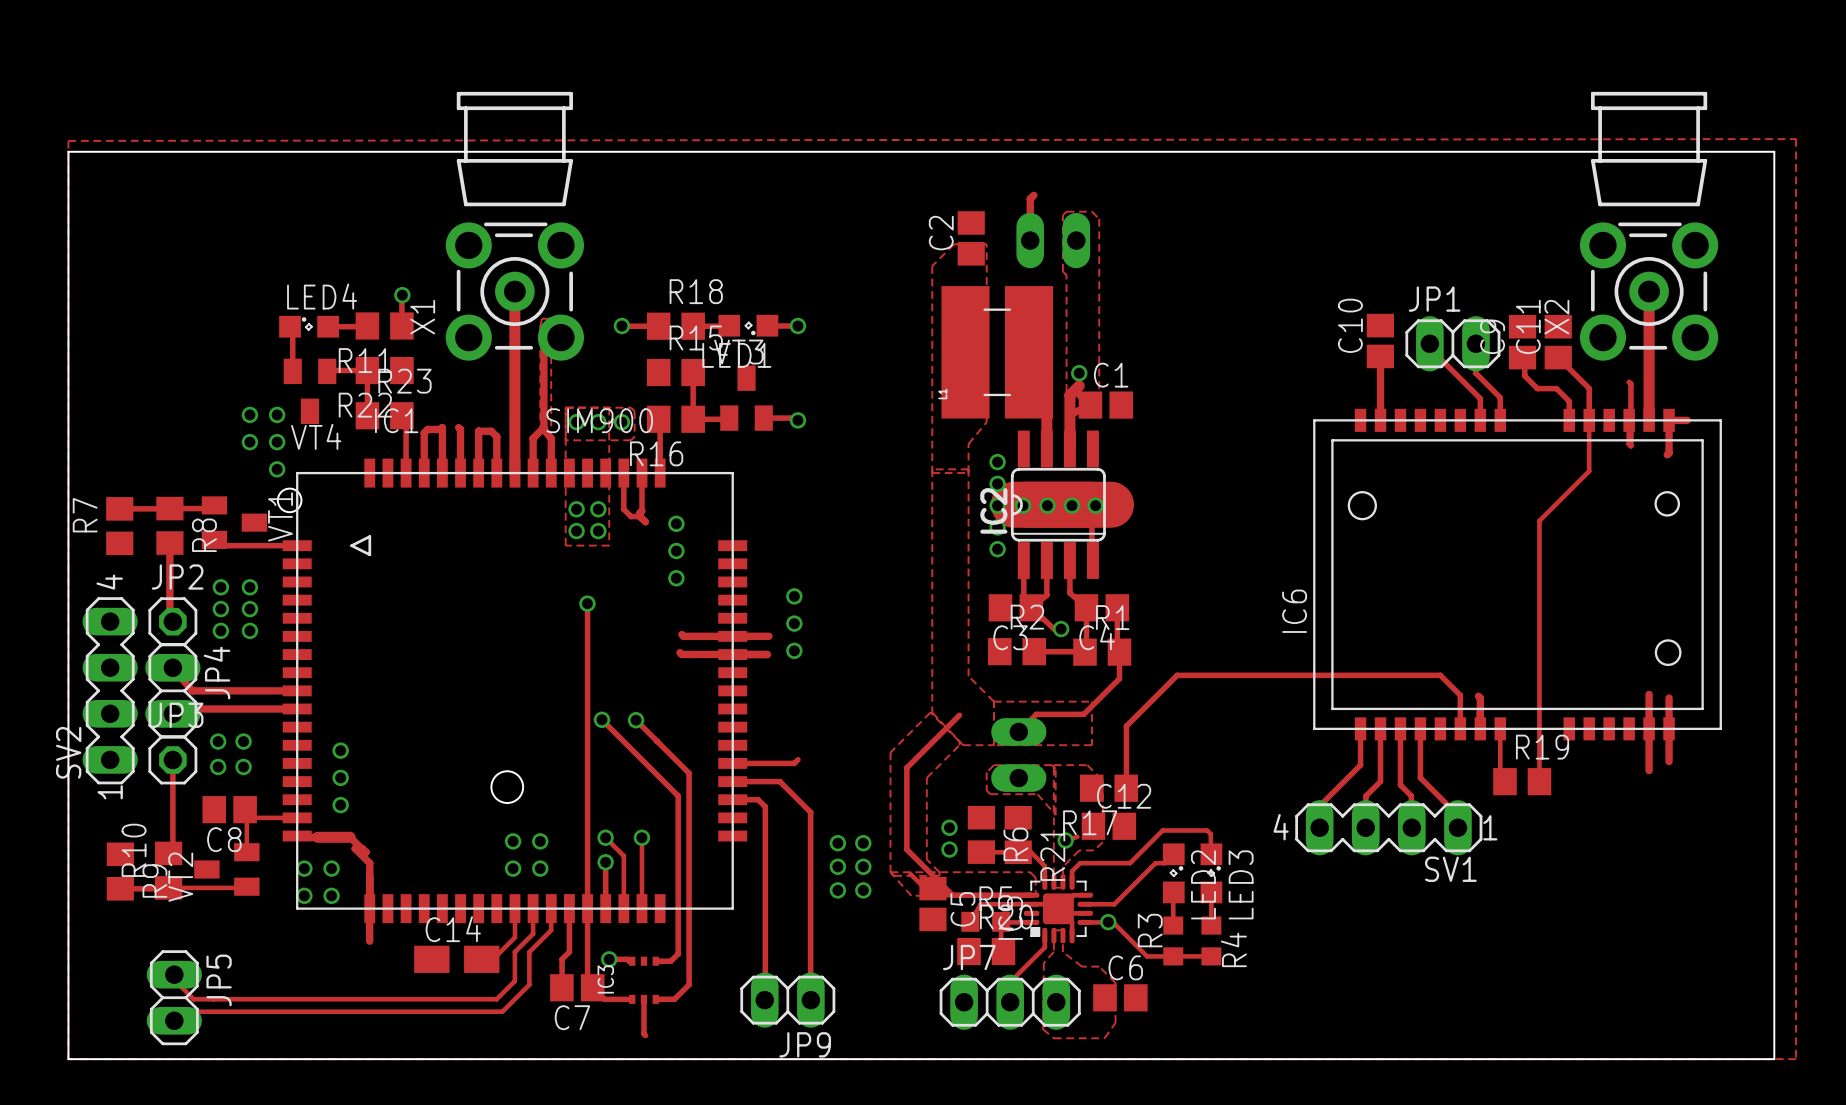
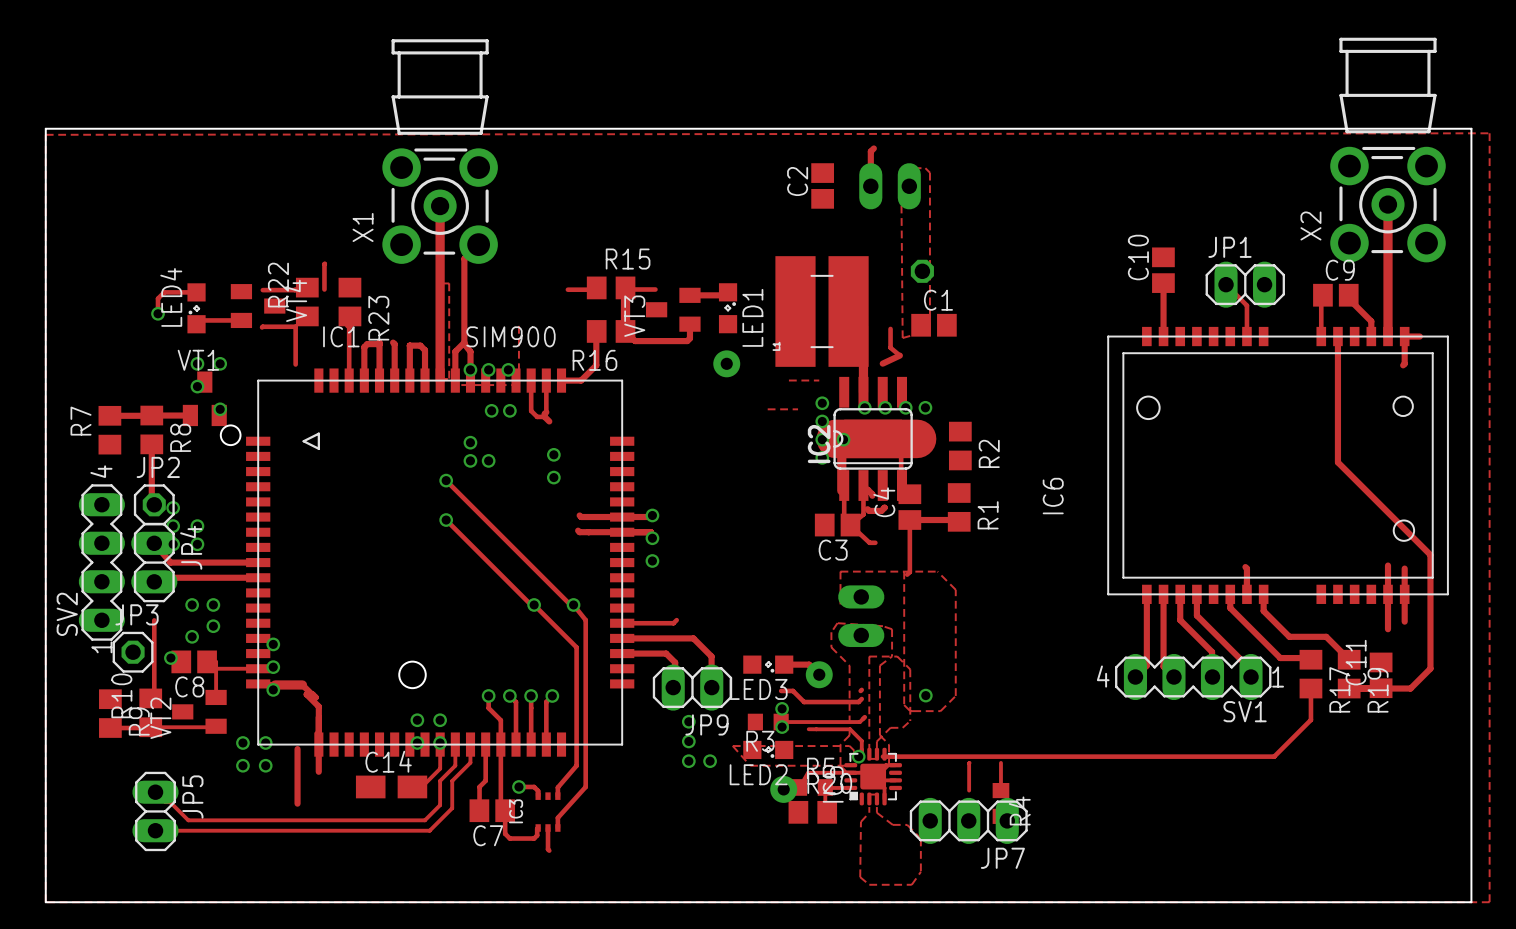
board edge: (68, 151) (1774, 151) -> (45, 143) (45, 128) (1471, 128) (1471, 143)
zone outline: none -> (901, 168) (925, 168) (929, 172) (929, 330) (902, 338) (901, 168)
track: (1033, 195) (1030, 198) (1030, 240) -> (873, 148) (870, 151) (870, 186)
zone outline: (1066, 211) (1062, 215) (1062, 271) (1066, 275) (1066, 416) (1099, 416) (1099, 218) (1091, 211) (1066, 211) -> none
track: none -> (1388, 204) (1388, 336)
X1 position: (514, 226) -> (440, 151)
track: none -> (440, 206) (440, 380)
X2 position: (1649, 226) -> (1388, 150)
C2 position: (971, 238) -> (822, 185)
part position: (1053, 240) -> (890, 186)
track: none -> (478, 244) (464, 258) (464, 342) (455, 351) (455, 380)
track: (514, 291) (514, 473) -> none
track: (1649, 291) (1649, 420) -> none
via: (402, 295) -> none
part: none -> (922, 271)
track: none -> (1226, 284) (1246, 305) (1246, 336)
track: none -> (625, 287) (625, 331) (635, 341) (687, 341) (689, 338) (689, 324)
LED1 rotation: 0° (748, 325) -> 90° counterclockwise (728, 308)
LED1 position: (748, 325) -> (728, 308)
track: (290, 326) (292, 329) (292, 371) -> none
LED4 rotation: 0° (309, 326) -> 90° counterclockwise (196, 308)
LED4 position: (309, 326) -> (196, 308)
R11: (384, 326) -> none
via: (621, 326) -> none
track: (622, 326) (658, 326) -> none
R18: (675, 326) -> none
via: (797, 326) -> none
track: none -> (196, 292) (164, 292) (158, 298) (158, 313)
track: none -> (728, 292) (725, 295) (689, 295)
track: none -> (1348, 295) (1348, 298) (1371, 321) (1371, 336)
track: none -> (1323, 295) (1321, 296) (1321, 336)
track: (560, 337) (543, 327) (543, 427) (533, 438) (533, 473) -> none
C10 position: (1380, 341) -> (1163, 270)
C9 rotation: 0° (1522, 342) -> 90° clockwise (1335, 295)
C9 position: (1522, 342) -> (1335, 295)
C11 position: (1558, 342) -> (1381, 675)
track: (1429, 343) (1429, 348) (1480, 398) (1480, 420) -> none
JP1 position: (1452, 343) -> (1245, 284)
track: (1475, 343) (1475, 373) (1500, 397) (1500, 420) -> none
via: none -> (158, 313)
track: (1380, 356) (1380, 420) -> (1163, 283) (1163, 336)
track: (1522, 357) (1524, 359) (1524, 375) (1537, 388) (1556, 388) (1569, 401) (1569, 420) -> none
track: (1558, 357) (1589, 388) (1589, 471) (1539, 520) (1539, 781) -> none
track: none -> (349, 316) (349, 380)
track: none -> (241, 320) (200, 320) (196, 324)
R22 rotation: 0° (384, 370) -> 90° clockwise (307, 302)
R15 position: (675, 372) -> (611, 287)
track: (693, 372) (693, 419) (729, 418) -> none
via: (1079, 373) -> none
track: none -> (596, 331) (596, 365) (581, 380) (561, 380)
track: none -> (1337, 336) (1337, 462) (1430, 554) (1430, 668) (1410, 688) (1349, 688)
track: (1629, 382) (1630, 384) (1630, 445) (1629, 443) (1629, 420) -> none
track: (1079, 385) (1069, 395) (1069, 448) -> none
VT4 rotation: 0° (309, 391) -> 90° counterclockwise (258, 306)
VT4 position: (309, 391) -> (258, 306)
VT3 rotation: 0° (746, 398) -> 90° counterclockwise (673, 309)
VT3 position: (746, 398) -> (673, 309)
C1 position: (1105, 405) -> (934, 325)
zone outline: (609, 407) (609, 545) (565, 545) (565, 407) (631, 407) (634, 411) -> (518, 325) (518, 360)
via: none -> (726, 363)
R23 rotation: 0° (384, 415) -> 90° clockwise (349, 302)
R23 position: (384, 415) -> (349, 302)
track: (401, 415) (406, 419) (406, 473) -> none
track: (763, 418) (795, 418) (797, 420) -> none
track: (658, 419) (660, 473) -> none
R16 position: (675, 419) -> (611, 331)
via: (797, 420) -> none
track: (1687, 420) (1669, 420) (1669, 453) (1667, 454) -> (1419, 336) (1404, 336) (1403, 365)
track: (442, 427) (442, 473) -> (379, 342) (379, 380)
track: (458, 427) (460, 429) (460, 473) -> (393, 342) (394, 344) (394, 380)
track: (442, 429) (427, 429) (424, 432) (424, 473) -> (379, 344) (367, 344) (364, 347) (364, 380)
track: (543, 429) (551, 438) (551, 473) -> (464, 344) (470, 351) (470, 380)
track: (478, 431) (478, 473) -> (409, 345) (409, 380)
track: (478, 431) (491, 431) (496, 436) (496, 473) -> (409, 345) (420, 345) (425, 350) (425, 380)
via: (277, 442) -> none
via: none -> (864, 407)
via: none -> (885, 407)
via: none -> (905, 407)
via: none -> (925, 407)
via: none -> (491, 410)
via: none -> (509, 410)
zone outline: (932, 472) (968, 472) -> (788, 380) (819, 380)
track: (623, 473) (623, 509) (631, 516) (640, 516) -> (531, 380) (531, 410) (537, 416) (544, 416)
track: (641, 473) (641, 511) (640, 516) -> (546, 380) (544, 416)
track: none -> (190, 415) (109, 415)
track: (214, 505) (211, 508) (119, 508) -> none
via: (1047, 505) -> none
via: (1072, 505) -> none
via: (1095, 505) -> none
via: (598, 509) -> none
track: none -> (151, 444) (151, 504) (154, 504)
track: (640, 516) (645, 521) -> (544, 416) (549, 421)
track: none -> (838, 448) (841, 451) (841, 490)
VT1 rotation: 0° (234, 522) -> 90° counterclockwise (204, 398)
VT1 position: (234, 522) -> (204, 398)
R8 position: (169, 525) -> (151, 429)
R7 position: (119, 526) -> (109, 430)
track: (214, 539) (220, 545) (297, 545) -> none
track: (169, 543) (169, 621) (172, 621) -> none
via: (997, 549) -> none
track: none -> (446, 480) (570, 604) (573, 604) (585, 620) (585, 786) (557, 817) (557, 827)
via: none -> (446, 480)
track: (1069, 560) (1069, 593) (1086, 607) (1085, 652) (1034, 651) -> none
track: none -> (864, 494) (867, 489) (872, 495)
IC6 position: (1517, 574) -> (1278, 465)
via: (676, 578) -> none
via: (249, 587) -> none
track: none -> (884, 507) (881, 510) (869, 510) (867, 509)
track: none -> (446, 520) (576, 647) (576, 765) (557, 787) (557, 796)
via: none -> (446, 520)
track: (587, 603) (587, 982) (604, 999) (632, 999) -> none
via: (587, 603) -> none
track: none -> (959, 521) (957, 520) (909, 520) (909, 572) (907, 574)
C4 rotation: 0° (1101, 607) -> 90° clockwise (909, 507)
track: (1117, 607) (1119, 678) (1083, 714) (1036, 714) (1018, 731) -> none
IC6 name position: IC6 (1294, 611) -> IC6 (1053, 496)
JP2 position: (172, 621) -> (154, 504)
via: (1061, 629) -> none
track: (681, 634) (683, 636) (768, 636) -> (579, 515) (652, 517)
R2 rotation: 0° (1017, 651) -> 90° clockwise (960, 446)
R2 position: (1017, 651) -> (960, 446)
track: (680, 652) (681, 654) (767, 654) -> (578, 530) (650, 532)
R1 rotation: 0° (1102, 652) -> 90° clockwise (959, 507)
R1 position: (1102, 652) -> (959, 507)
zone outline: none -> (904, 571) (904, 705) (910, 711) (940, 711) (955, 695) (955, 589) (937, 571) (840, 571) (840, 604)
track: (172, 667) (192, 690) (297, 690) -> (154, 543) (170, 562) (258, 562)
SV2 position: (110, 690) -> (101, 562)
JP4 position: (172, 690) -> (154, 562)
IC1 position: (514, 690) -> (440, 562)
track: none -> (1146, 594) (1146, 665) (1135, 677)
track: none -> (1163, 594) (1163, 666) (1173, 677)
track: none -> (1180, 594) (1180, 620) (1212, 651) (1212, 677)
track: none -> (1196, 594) (1196, 615) (1245, 664) (1245, 671) (1251, 677)
track: none -> (1230, 594) (1230, 608) (1280, 658) (1309, 658) (1310, 659)
track: none -> (1263, 594) (1263, 611) (1289, 636) (1326, 636) (1349, 659)
track: (1649, 694) (1649, 770) -> (1388, 565) (1388, 629)
track: (1478, 696) (1480, 698) (1480, 728) -> (1245, 567) (1246, 594)
track: (1669, 698) (1669, 761) -> (1404, 568) (1404, 621)
zone outline: (993, 701) (993, 745) -> none
zone outline: (993, 701) (968, 676) (968, 443) (986, 422) (986, 244) (954, 244) (932, 266) (932, 712) (963, 745) (1091, 745) (1091, 701) (993, 701) -> none
via: none -> (192, 604)
via: none -> (213, 604)
via: none -> (573, 604)
track: (297, 709) (174, 709) (172, 713) -> (258, 577) (155, 577) (154, 581)
zone outline: (930, 712) (890, 752) (890, 872) (894, 875) (939, 875) (939, 872) (926, 859) (926, 777) (959, 745) (959, 741) (930, 712) -> none
track: (959, 715) (906, 767) (906, 849) (952, 895) (1031, 895) (931, 895) (910, 874) -> none
track: (601, 719) (678, 796) (678, 953) (670, 961) (655, 961) -> none
via: (601, 719) -> none
track: (636, 720) (689, 773) (689, 984) (674, 999) (655, 999) -> none
via position: (636, 720) -> (534, 604)
zone outline: none -> (837, 623) (882, 626) (892, 629) (892, 656) (879, 665) (879, 735) (889, 744) (889, 765) (882, 771) (846, 771) (840, 765) (840, 744) (849, 735) (849, 665) (831, 647) (831, 632) (837, 623)
via: none -> (213, 626)
track: (1360, 728) (1360, 765) (1320, 805) (1319, 827) -> none
track: (1380, 728) (1380, 781) (1365, 796) (1365, 827) -> none
track: (1400, 728) (1400, 785) (1411, 796) (1411, 827) -> none
track: (1420, 728) (1420, 777) (1456, 814) (1457, 827) -> none
track: (1460, 728) (1460, 695) (1440, 675) (1177, 675) (1126, 726) (1126, 788) -> none
track: (1500, 728) (1500, 776) (1505, 781) -> none
via: (218, 741) -> none
track: none -> (622, 638) (693, 638) (711, 656) (711, 687)
part position: (1018, 755) -> (861, 616)
track: (172, 759) (172, 849) (168, 853) -> (154, 620) (154, 694) (150, 698)
track: (797, 759) (794, 763) (732, 763) -> (676, 620) (673, 623) (622, 623)
track: none -> (622, 653) (666, 653) (675, 662) (675, 685) (673, 687)
zone outline: (993, 765) (1052, 765) (1055, 768) (1055, 815) (1037, 794) (990, 794) (986, 790) (986, 772) (993, 765) -> none
via: (243, 766) -> none
track: none -> (207, 661) (216, 661) (216, 697)
track: none -> (784, 664) (809, 664) (819, 674) (814, 670)
track: (732, 781) (779, 781) (810, 812) (810, 999) -> none
R19 rotation: 0° (1522, 781) -> 90° clockwise (1349, 674)
R19 position: (1522, 781) -> (1349, 674)
via: none -> (819, 674)
R17 rotation: 0° (1109, 788) -> 90° clockwise (1310, 674)
R17 position: (1109, 788) -> (1310, 674)
track: none -> (258, 683) (302, 684) (314, 697) (315, 697) (312, 694) (306, 694) (318, 706) (318, 771)
track: (732, 799) (758, 799) (765, 806) (764, 1000) -> none
track: none -> (1310, 688) (1310, 719) (1274, 756) (882, 756)
track: none -> (861, 689) (860, 690)
track: none -> (781, 690) (793, 690) (804, 702) (858, 702) (861, 699)
C8 position: (229, 809) -> (194, 661)
track: (245, 809) (246, 809) (246, 852) -> none
via: none -> (925, 695)
track: none -> (488, 695) (488, 708) (500, 720) (500, 806) (505, 810) (505, 833) (509, 838) (534, 838) (537, 835) (538, 827)
via: none -> (488, 695)
track: none -> (509, 695) (516, 702) (516, 744)
via: none -> (509, 695)
track: none -> (531, 695) (531, 744)
via: none -> (531, 695)
track: none -> (552, 695) (546, 701) (546, 744)
via: none -> (552, 695)
track: (246, 817) (297, 817) -> (216, 668) (258, 668)
R17 name position: R17 (1090, 822) -> R17 (1339, 689)
C12: (1108, 826) -> none
SV1 position: (1388, 827) -> (1193, 677)
R6: (981, 834) -> none
R21: (1018, 835) -> none
track: (297, 836) (350, 837) (365, 852) (366, 852) (362, 848) (355, 848) (369, 863) (369, 908) -> none
track: (1077, 836) (1065, 840) -> none
track: (605, 837) (623, 855) (623, 908) -> none
via: (605, 837) -> none
track: (641, 837) (641, 908) -> none
via: (641, 837) -> none
track: none -> (864, 717) (859, 722) (781, 722)
via: (1065, 840) -> none
via: (863, 843) -> none
track: (1173, 854) (1164, 863) (1155, 863) (1114, 904) (1085, 904) -> none
track: (1211, 854) (1210, 834) (1207, 830) (1162, 830) (1130, 863) (1080, 863) (1072, 871) (1072, 882) -> none
track: (605, 862) (605, 908) -> none
via: (605, 862) -> none
via: (863, 866) -> none
VT2 position: (226, 869) -> (199, 711)
R10 position: (168, 870) -> (150, 712)
track: none -> (455, 744) (455, 765) (440, 780) (440, 805) (424, 820) (188, 820) (170, 802) (165, 802) (155, 792)
track: none -> (470, 744) (470, 762) (452, 780) (452, 808) (429, 830) (155, 830)
R9 position: (120, 871) -> (110, 713)
LED2 rotation: 0° (1173, 873) -> 90° clockwise (768, 749)
LED2 position: (1173, 873) -> (768, 749)
LED3 rotation: 0° (1211, 873) -> 90° clockwise (768, 664)
LED3 position: (1211, 873) -> (768, 664)
via: none -> (858, 756)
track: (246, 886) (120, 888) -> (216, 726) (110, 728)
C5: (932, 904) -> none
track: (514, 908) (514, 937) (496, 955) (485, 955) (481, 959) -> (440, 744) (440, 768) (424, 783) (415, 783) (412, 786)
track: (533, 908) (533, 933) (514, 952) (514, 981) (496, 999) (193, 999) (179, 984) (179, 979) (174, 974) -> none
track: (551, 908) (551, 930) (529, 952) (529, 984) (502, 1011) (183, 1011) (174, 1020) -> none
track: (569, 908) (569, 951) (562, 959) (562, 987) -> (485, 744) (485, 780) (479, 786) (479, 810)
track: none -> (518, 786) (534, 786) (538, 790) (538, 796)
via: none -> (518, 786)
track: (1085, 922) (1112, 922) (1147, 956) (1211, 956) -> none
via: (1108, 922) -> none
via: none -> (783, 789)
R3 name position: R3 (1150, 930) -> R3 (760, 741)
track: (1044, 935) (1044, 947) (1007, 984) (1007, 999) (1010, 1002) -> none
R3 rotation: 0° (1173, 940) -> 90° clockwise (768, 722)
R3 position: (1173, 940) -> (768, 722)
JP7 name position: JP7 (969, 957) -> JP7 (1002, 858)
C14 position: (456, 959) -> (391, 786)
track: (609, 959) (627, 959) (632, 961) -> none
via: (609, 959) -> none
track: none -> (548, 827) (549, 850)
IC3 position: (643, 980) -> (548, 812)
C7 position: (577, 987) -> (492, 810)
JP5 position: (174, 997) -> (155, 811)
C6: (1120, 997) -> none
track: (643, 999) (645, 1035) -> none
JP9 position: (787, 1000) -> (692, 687)
JP7 position: (1010, 1002) -> (968, 820)

